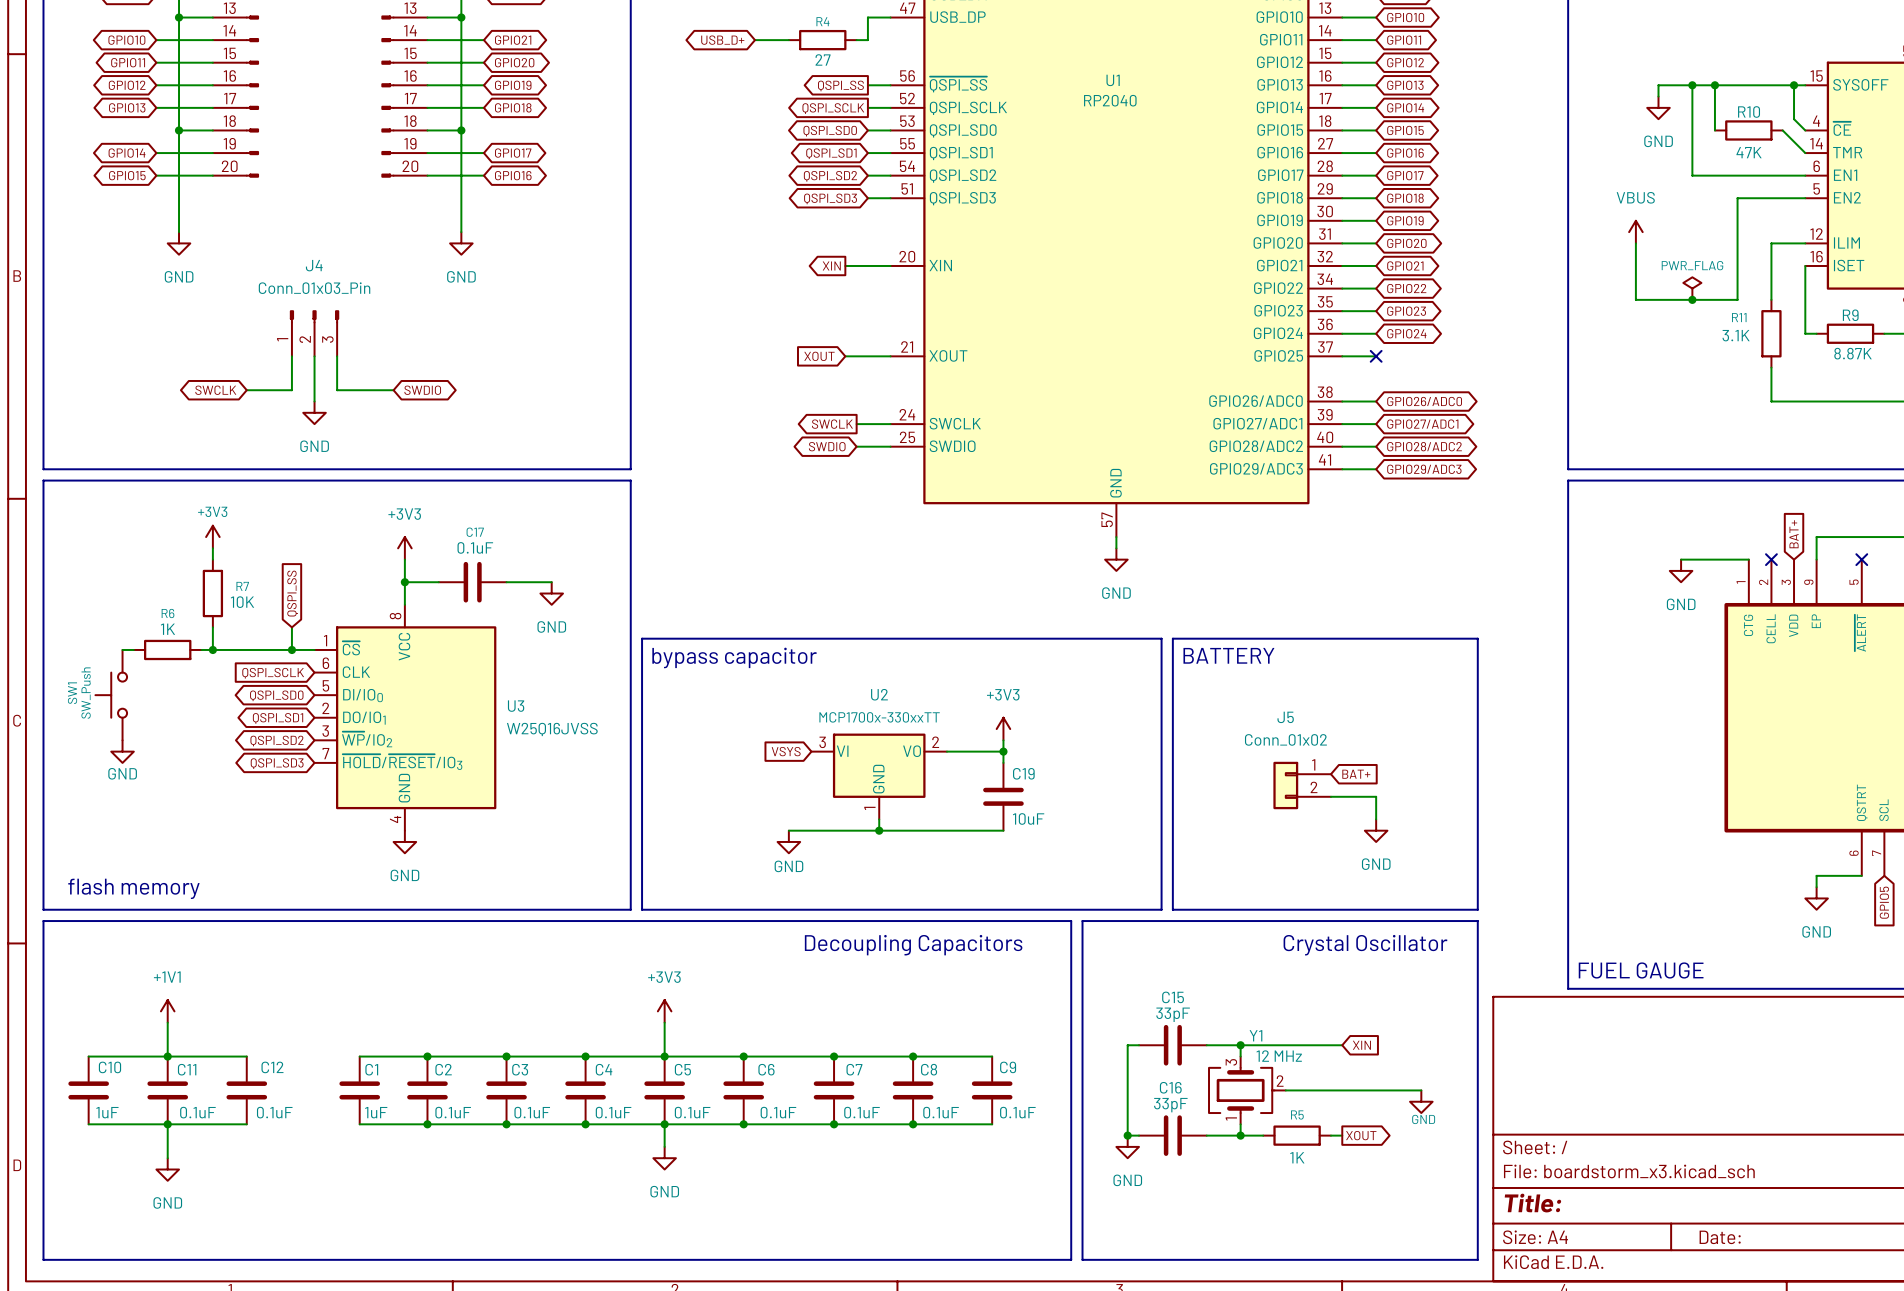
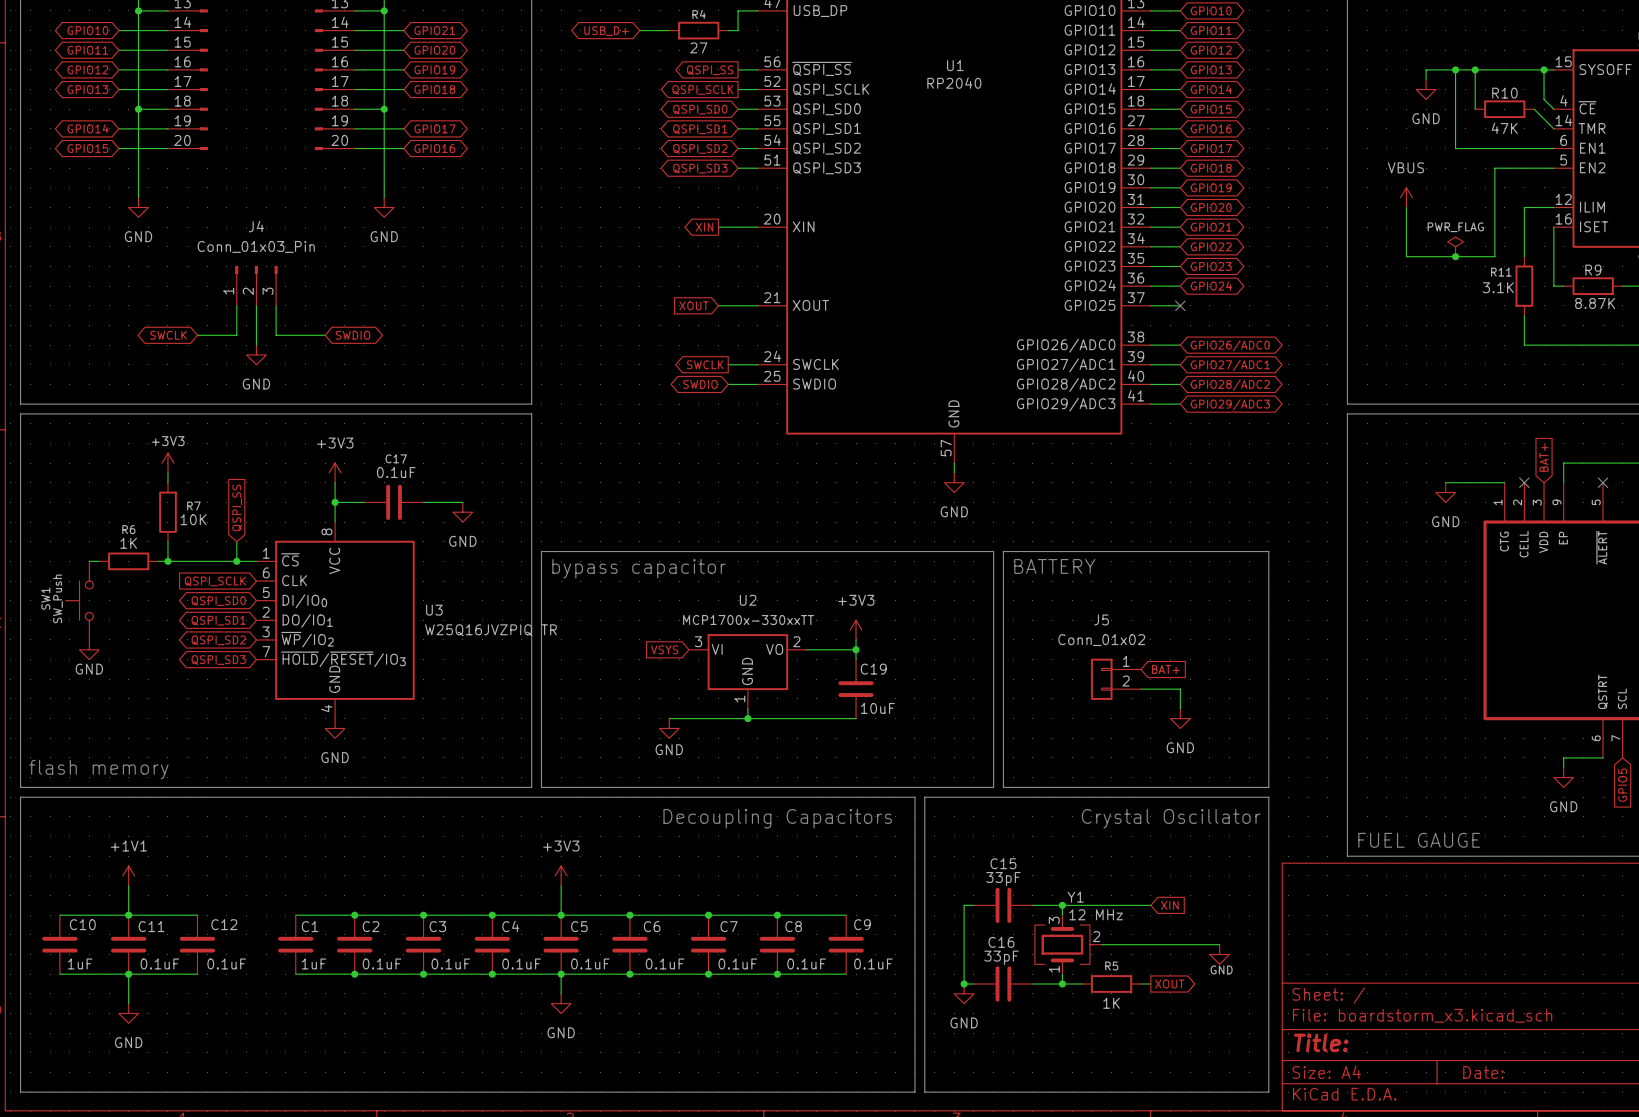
U3 value: W25Q16JVSS (552, 729) -> W25Q16JVZPIQ TR (491, 630)

